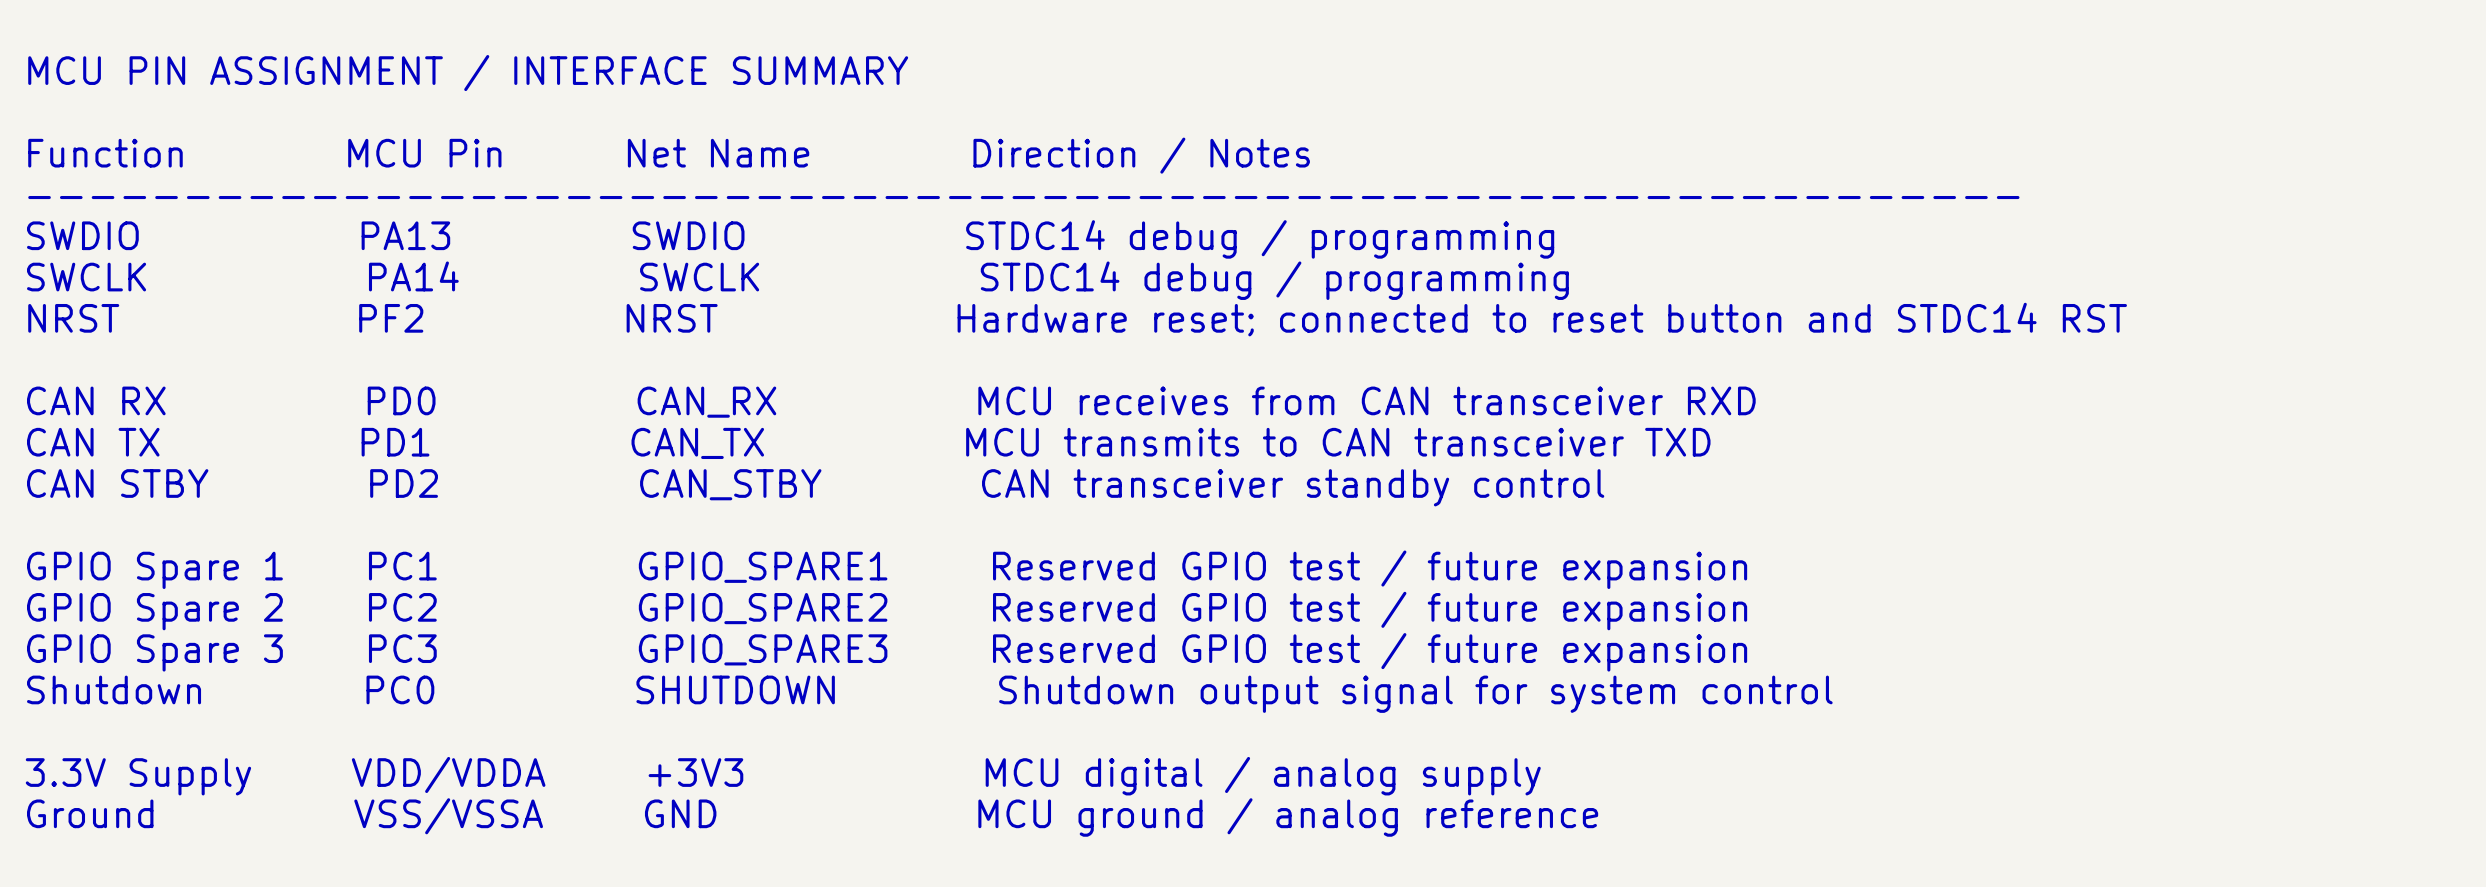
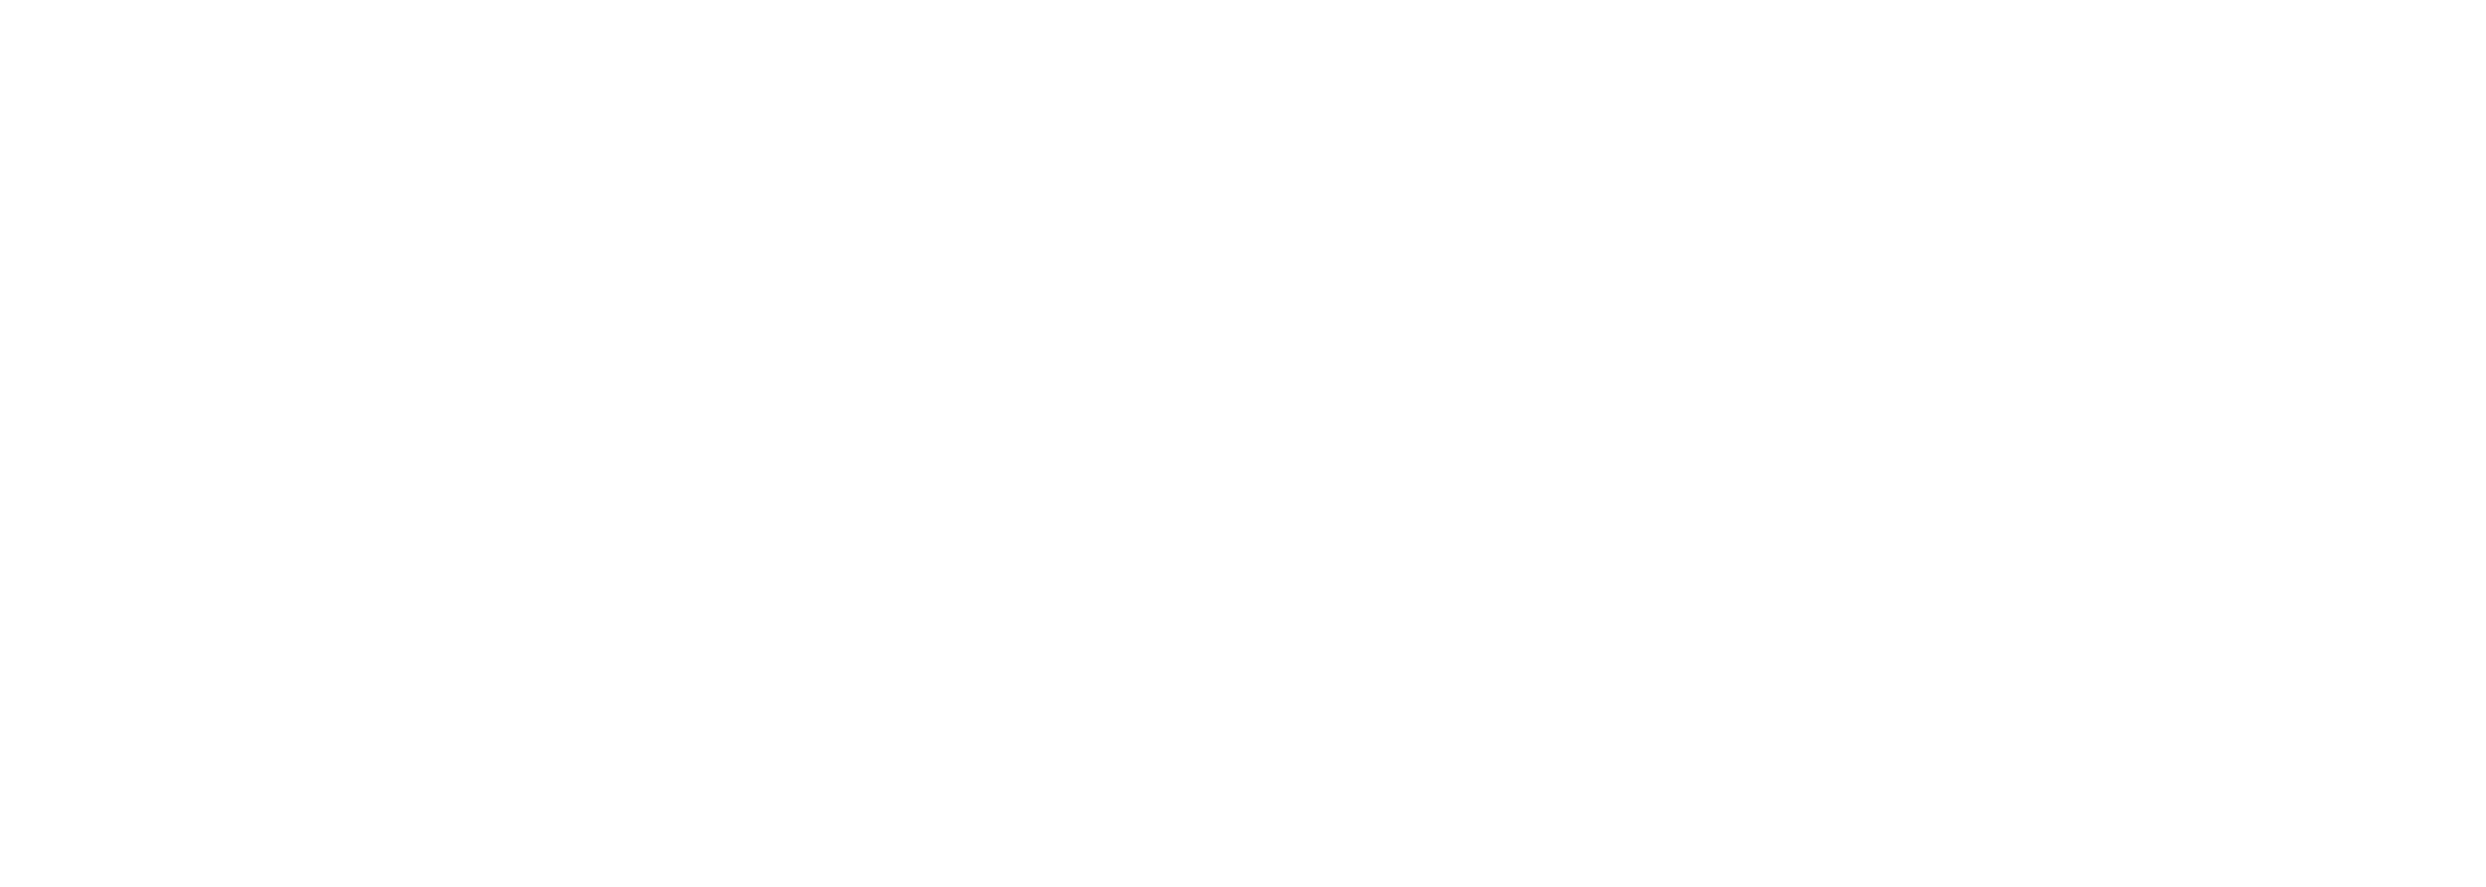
text: MCU PIN ASSIGNMENT / INTERFACE SUMMARY (468, 73) -> none
text: Function MCU Pin Net Name Direction / Notes (669, 155) -> none
text: --------------------------------------------------------------- (1023, 197) -> none
text: SWDIO PA13 SWDIO STDC14 debug / programming (790, 239) -> none
text: SWCLK PA14 SWCLK STDC14 debug / programming (797, 280) -> none
text: NRST PF2 NRST Hardware reset; connected to reset button and STDC14 RST (1077, 319) -> none
text: CAN RX PD0 CAN_RX MCU receives from CAN transceiver RXD (891, 402) -> none
text: CAN TX PD1 CAN_TX MCU transmits to CAN transceiver TXD (868, 443) -> none
text: CAN STBY PD2 CAN_STBY CAN transceiver standby control (815, 487) -> none
text: GPIO Spare 1 PC1 GPIO_SPARE1 Reserved GPIO test / future expansion (887, 569) -> none
text: GPIO Spare 2 PC2 GPIO_SPARE2 Reserved GPIO test / future expansion (887, 611) -> none
text: GPIO Spare 3 PC3 GPIO_SPARE3 Reserved GPIO test / future expansion (887, 652) -> none
text: Shutdown PC0 SHUTDOWN Shutdown output signal for system control (929, 694) -> none
text: 3.3V Supply VDD/VDDA +3V3 MCU digital / analog supply (783, 776) -> none
text: Ground VSS/VSSA GND MCU ground / analog reference (812, 817) -> none

